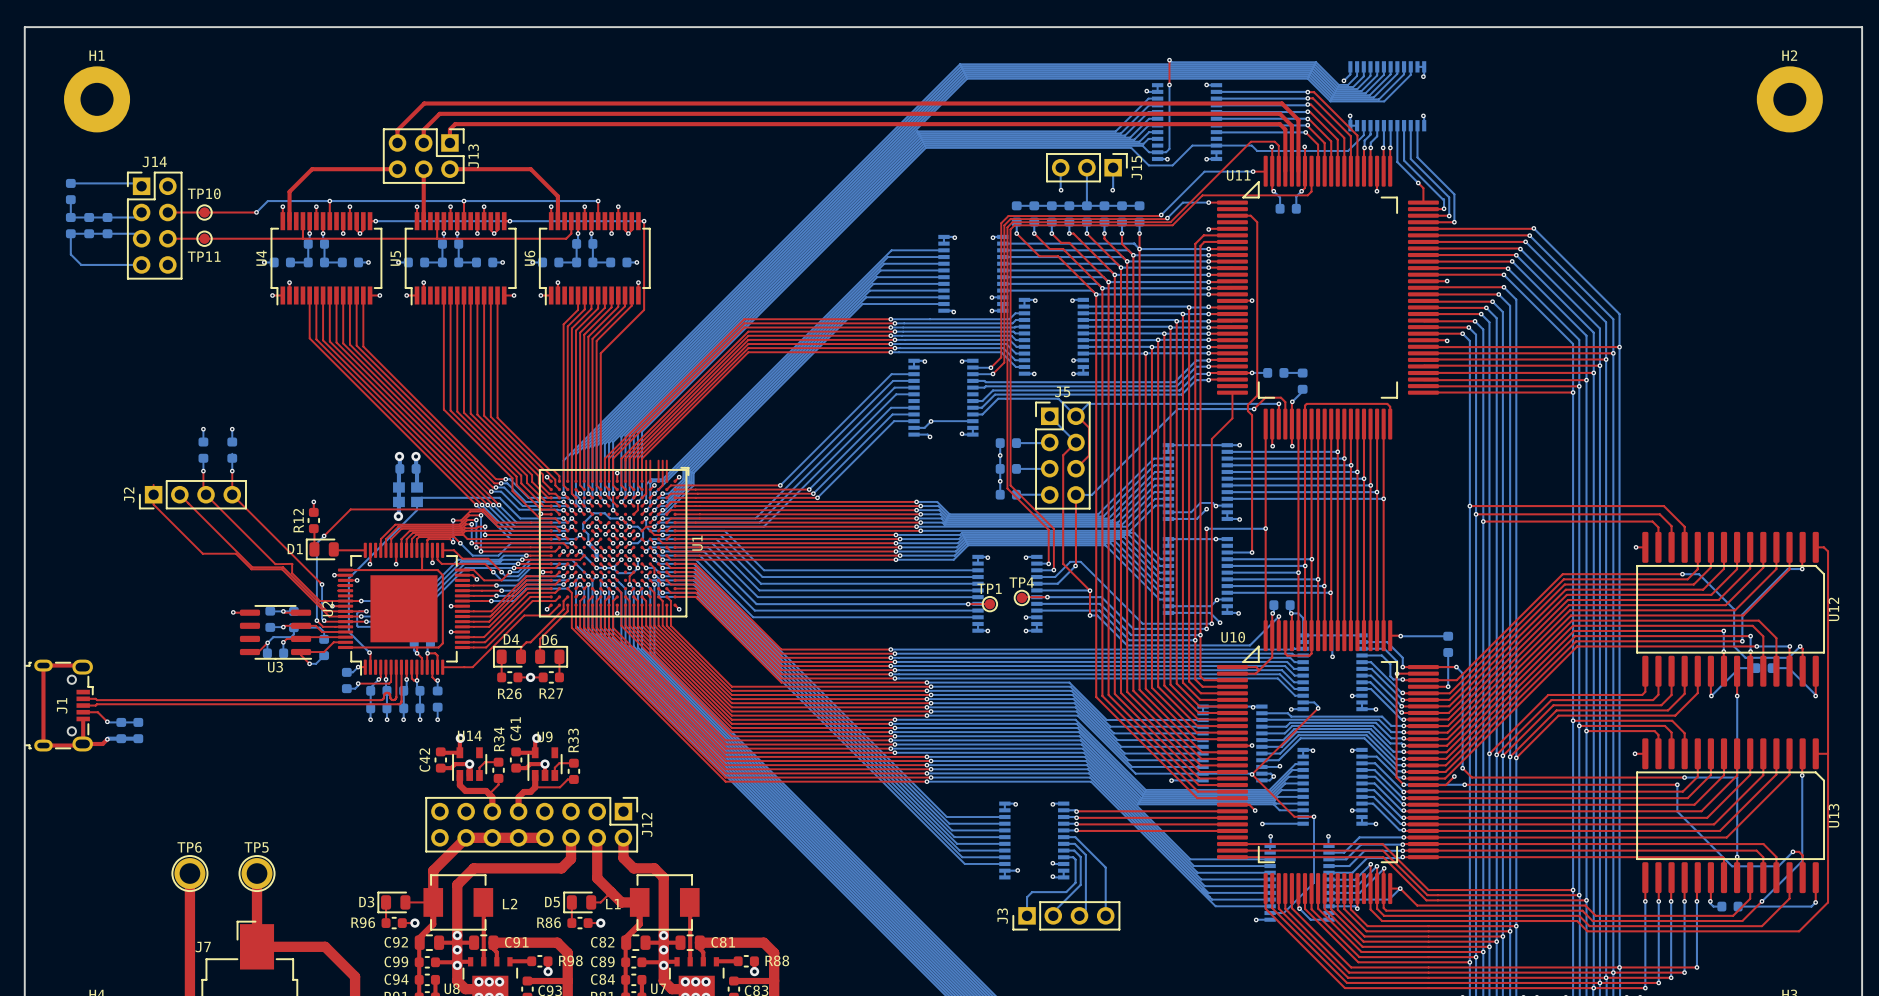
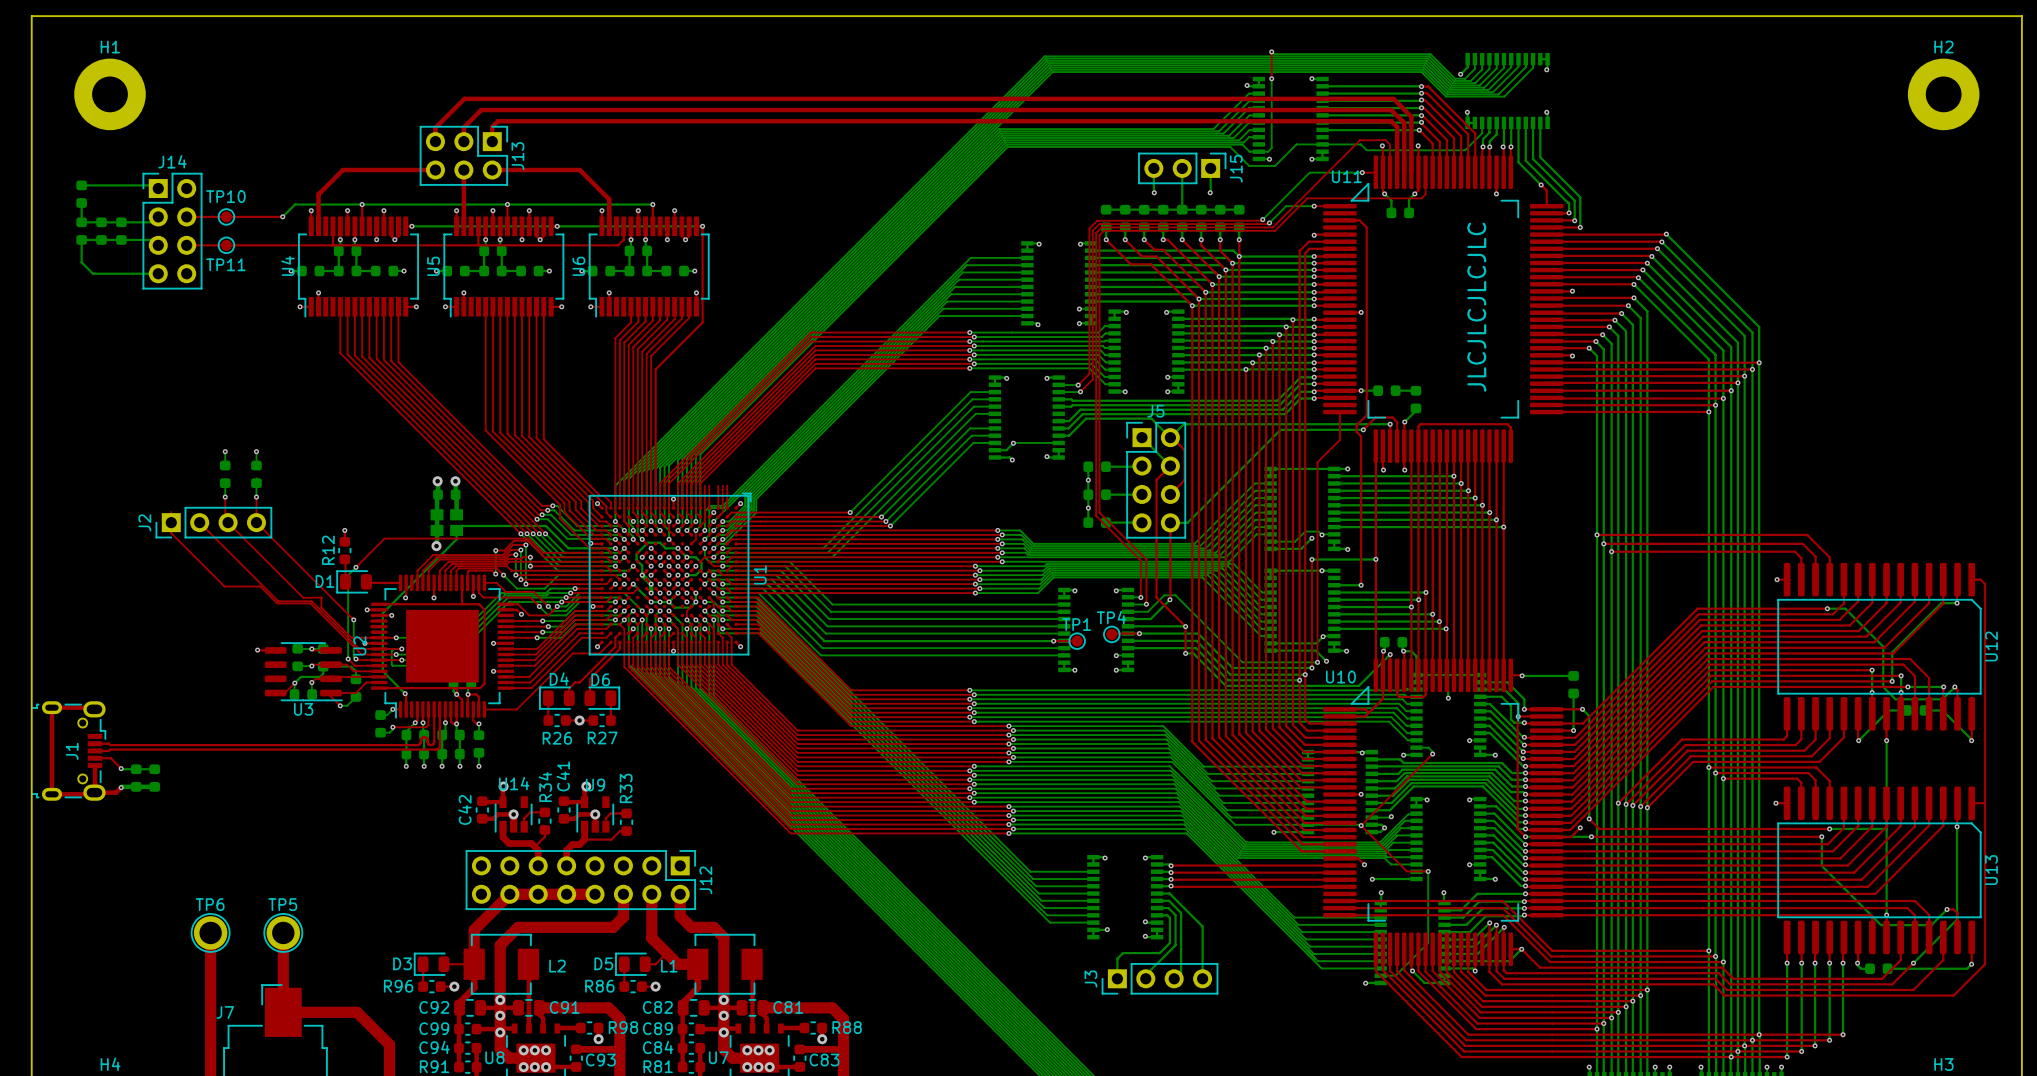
text: none -> JLCJLCJLCJLC (1476, 307)

